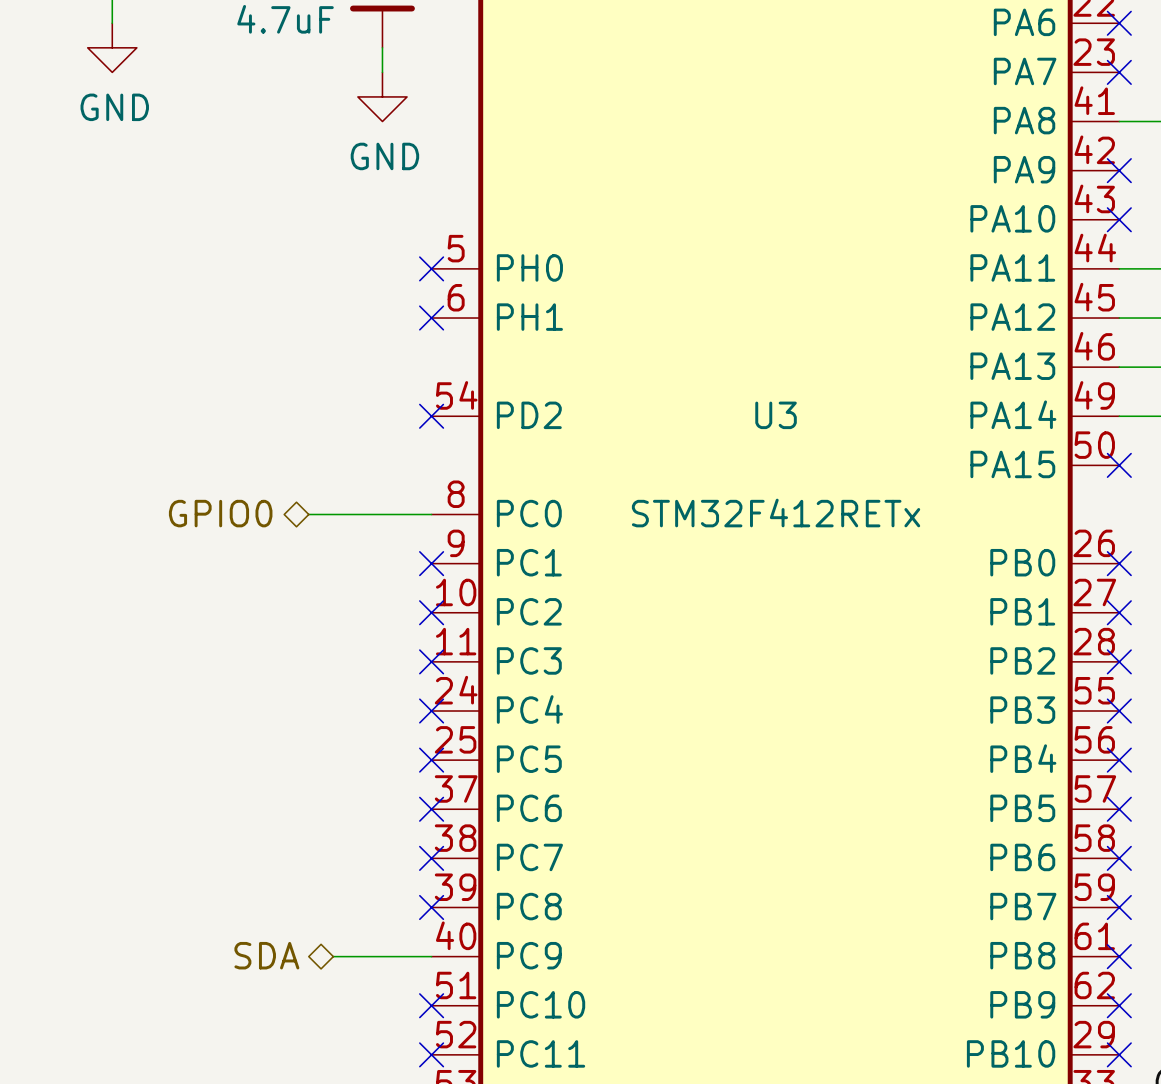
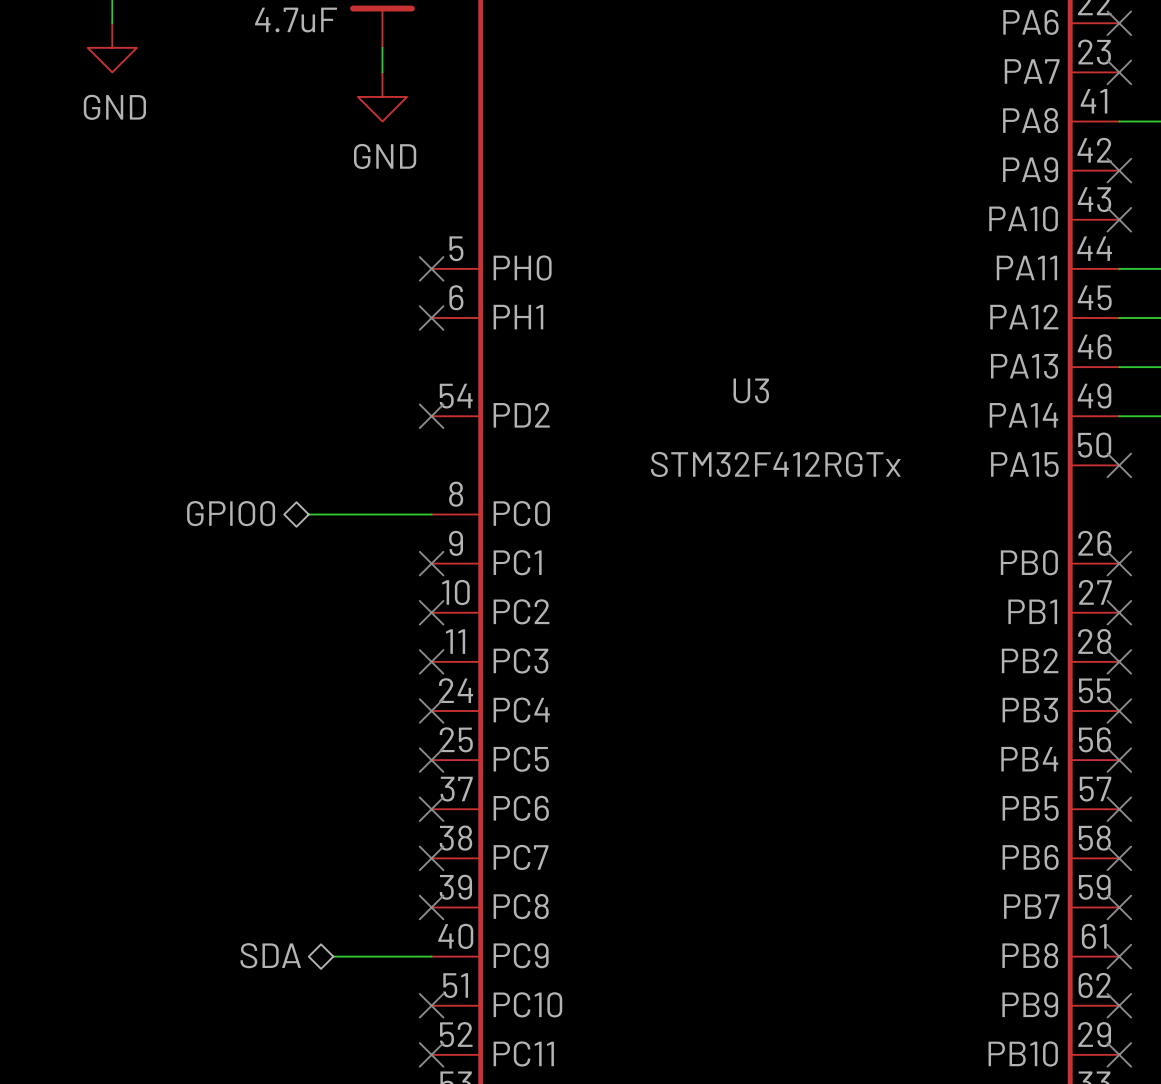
U3 name position: U3 (776, 415) -> U3 (751, 390)
U3 value: STM32F412RETx (776, 513) -> STM32F412RGTx (775, 464)

